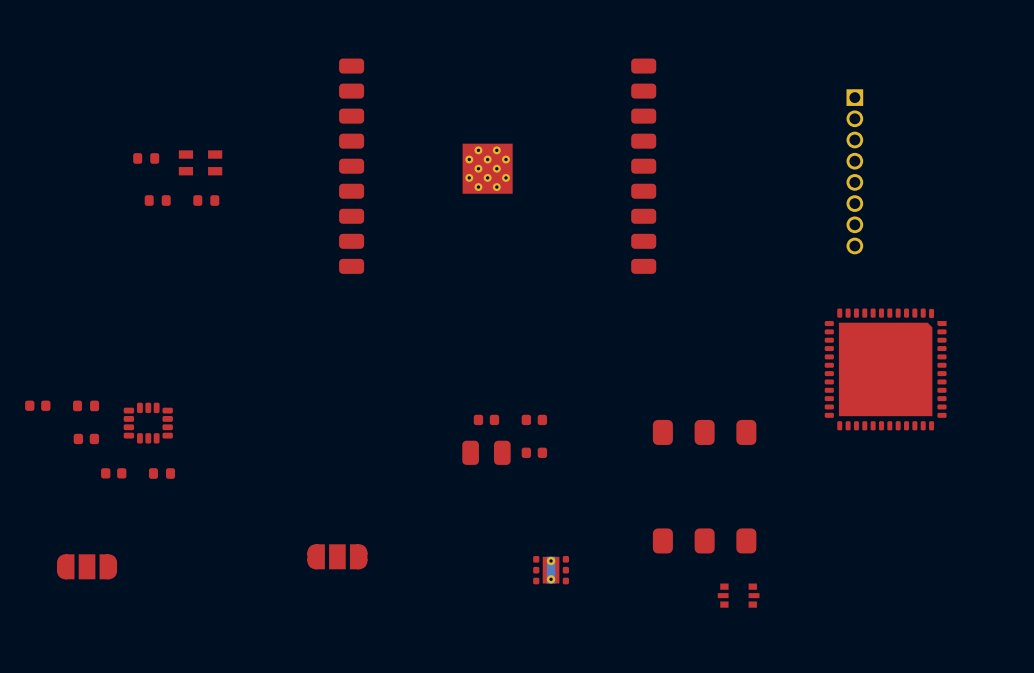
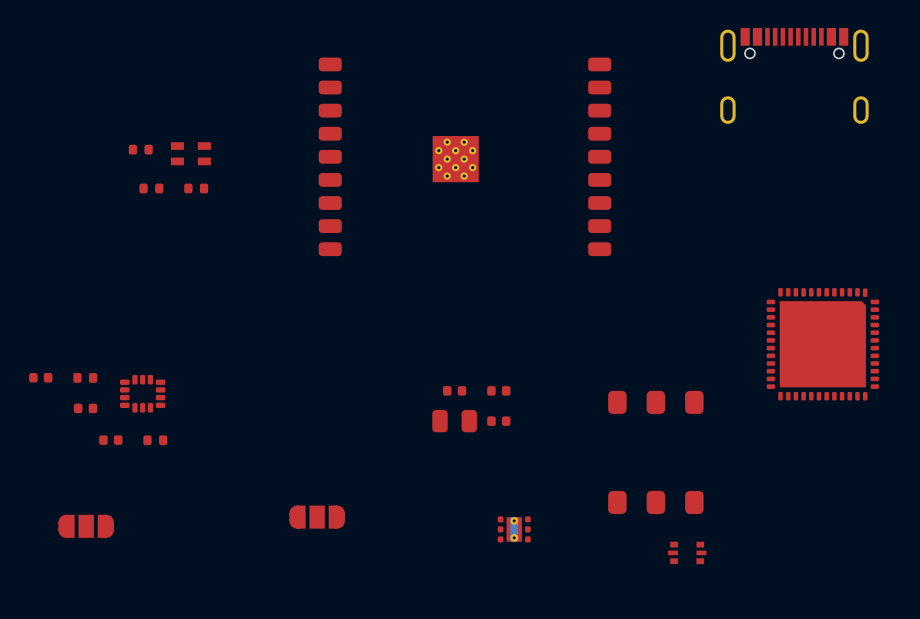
part: none -> (794, 75)
part: (854, 171) -> none

